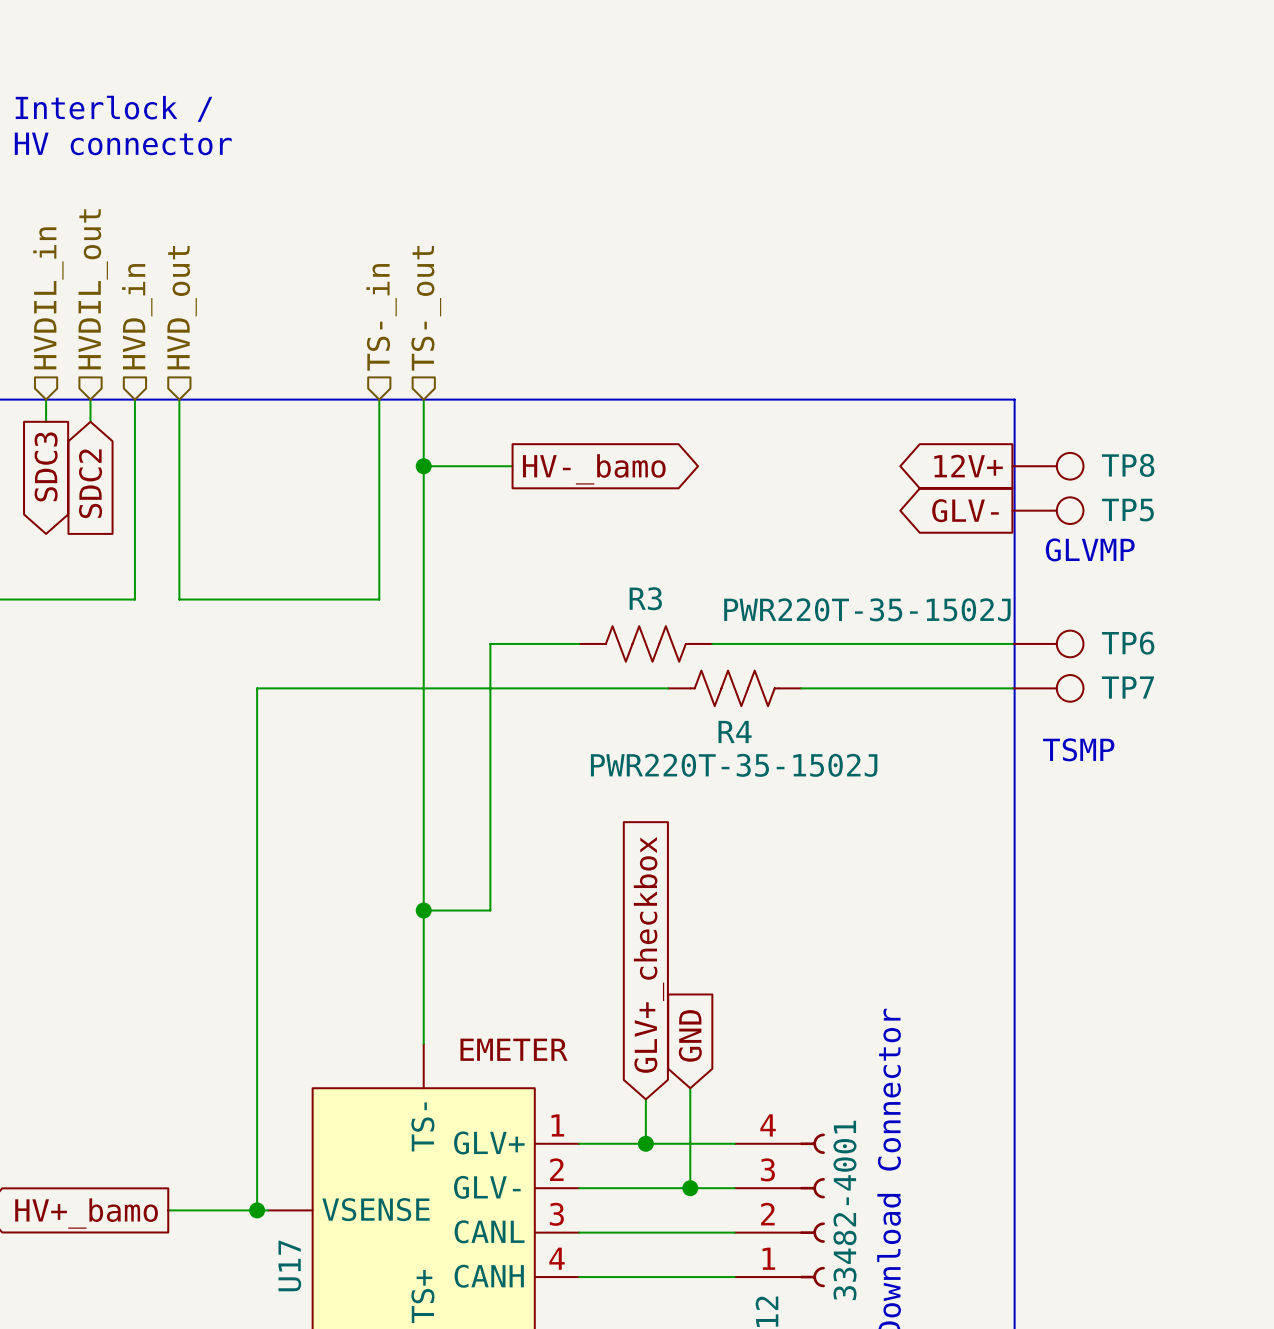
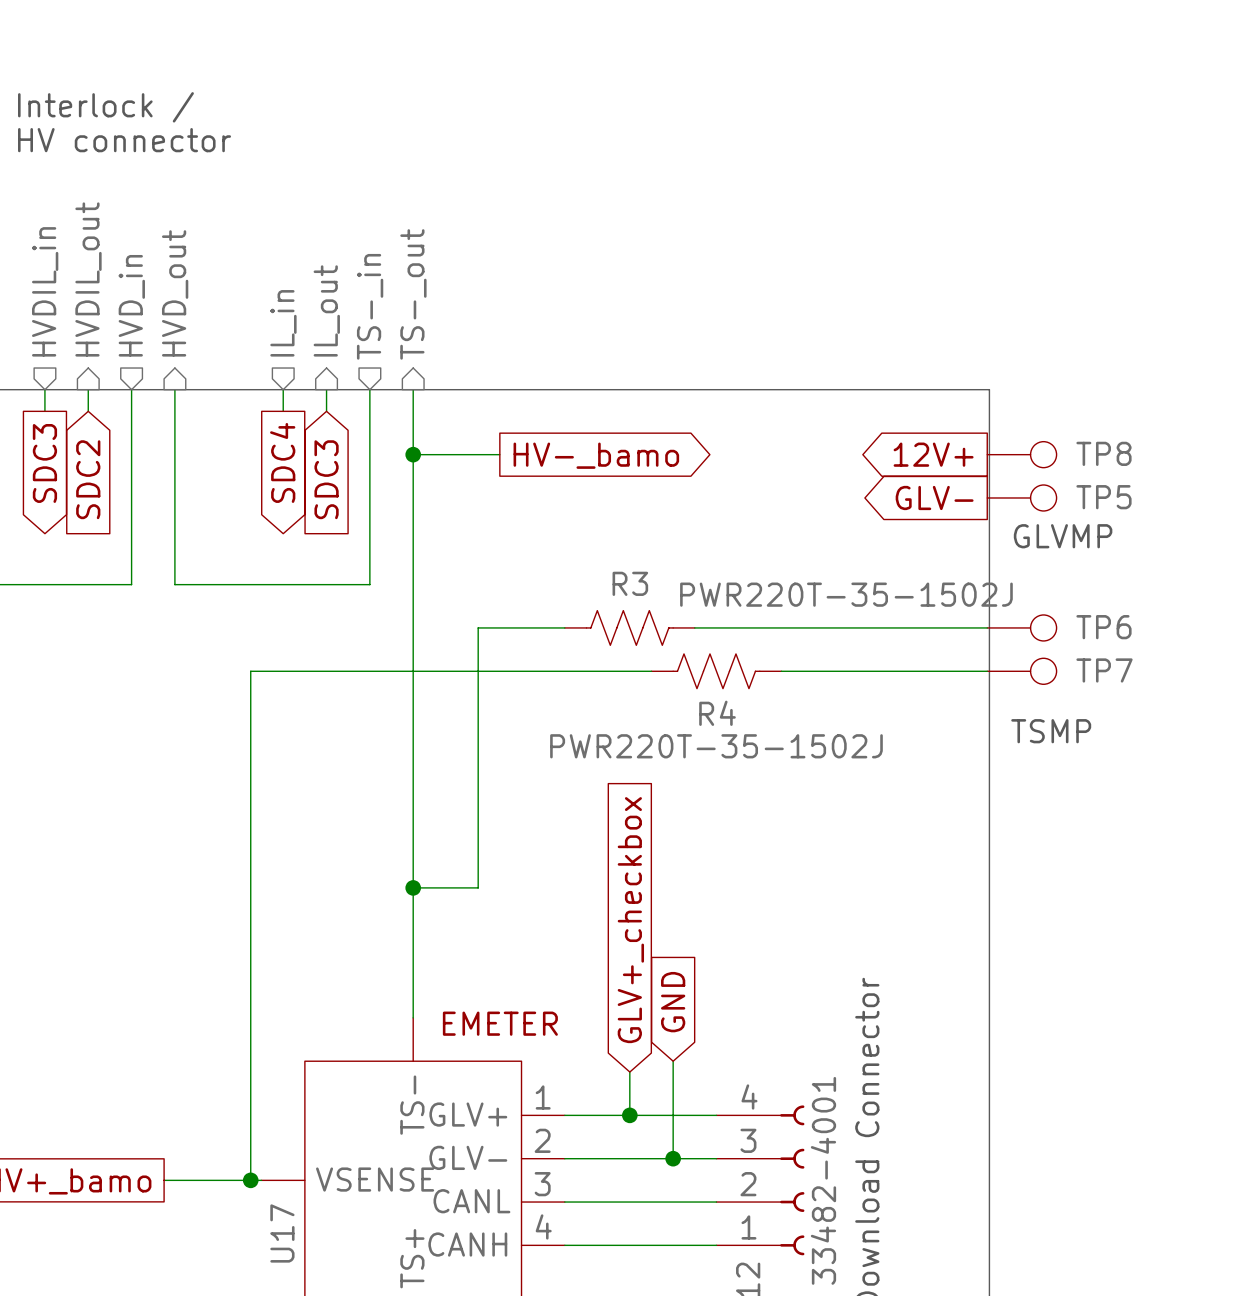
hierarchical label shape: input (93, 289) -> output (88, 279)
hierarchical label shape: input (182, 307) -> output (175, 293)
hierarchical label shape: input (426, 308) -> output (413, 294)
hierarchical label: none -> IL_out (326, 310)
hierarchical label: none -> IL_in (283, 323)
wire: none -> (283, 389) (283, 411)
wire: none -> (326, 389) (326, 411)
global label: none -> SDC4 (282, 462)
global label: none -> SDC3 (326, 479)

